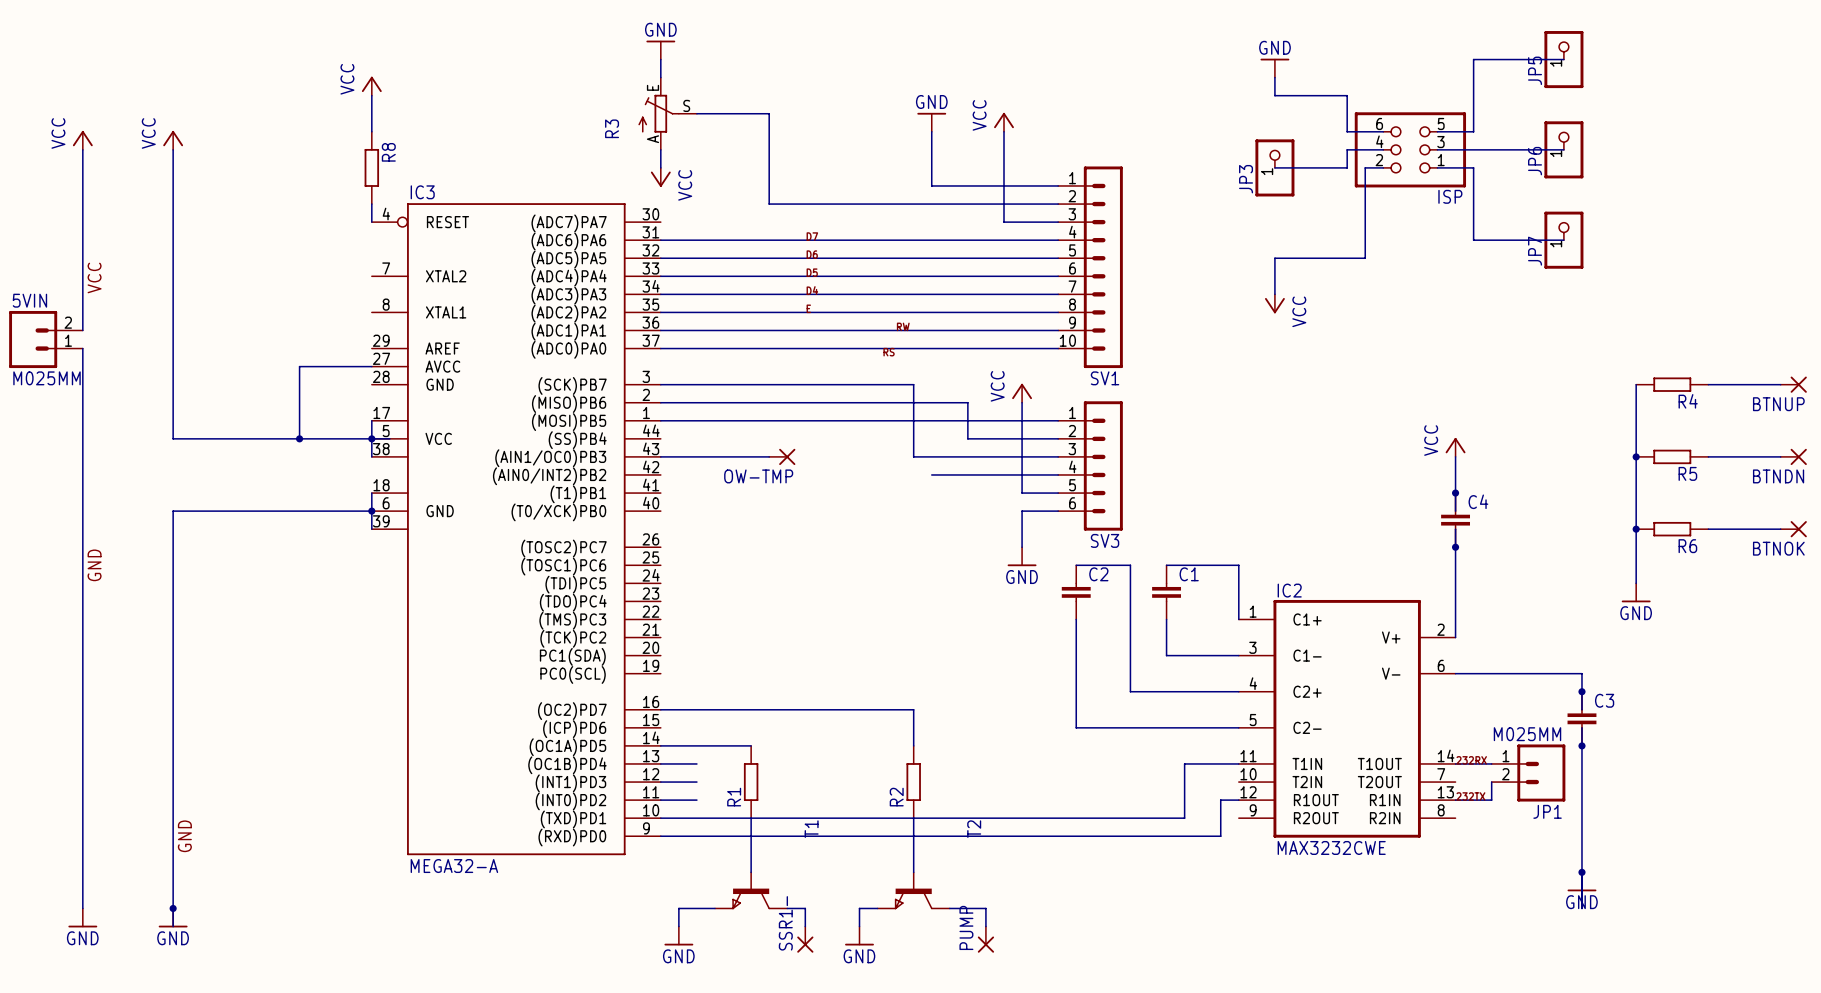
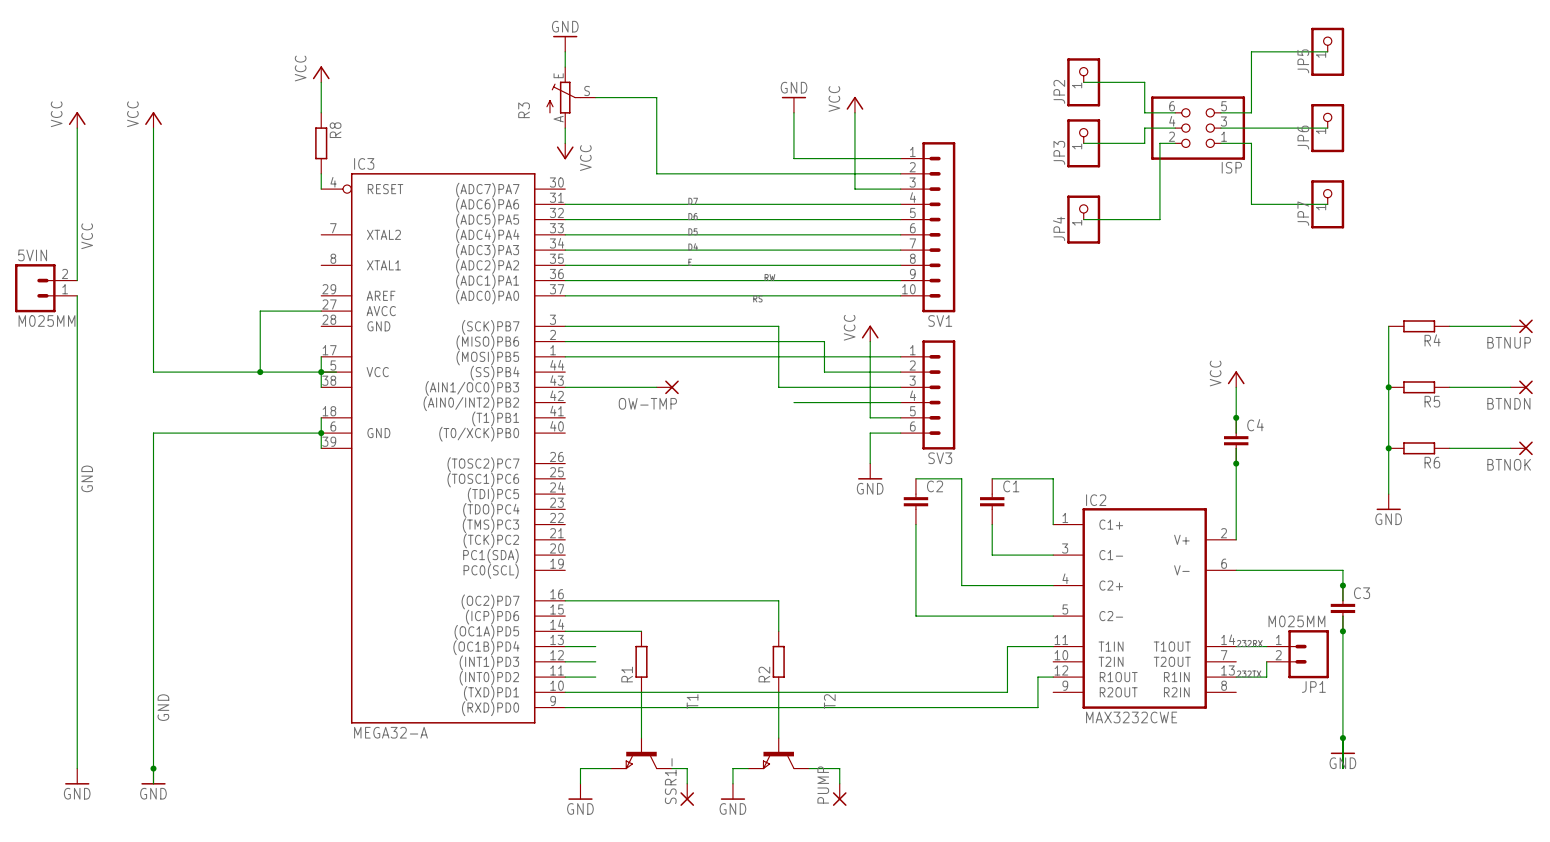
power symbol: GND (1274, 68) -> none
JP2: none -> (1083, 82)
wire: (1274, 258) (1274, 294) -> none
JP4: none -> (1083, 219)
power symbol: VCC (1274, 303) -> none

